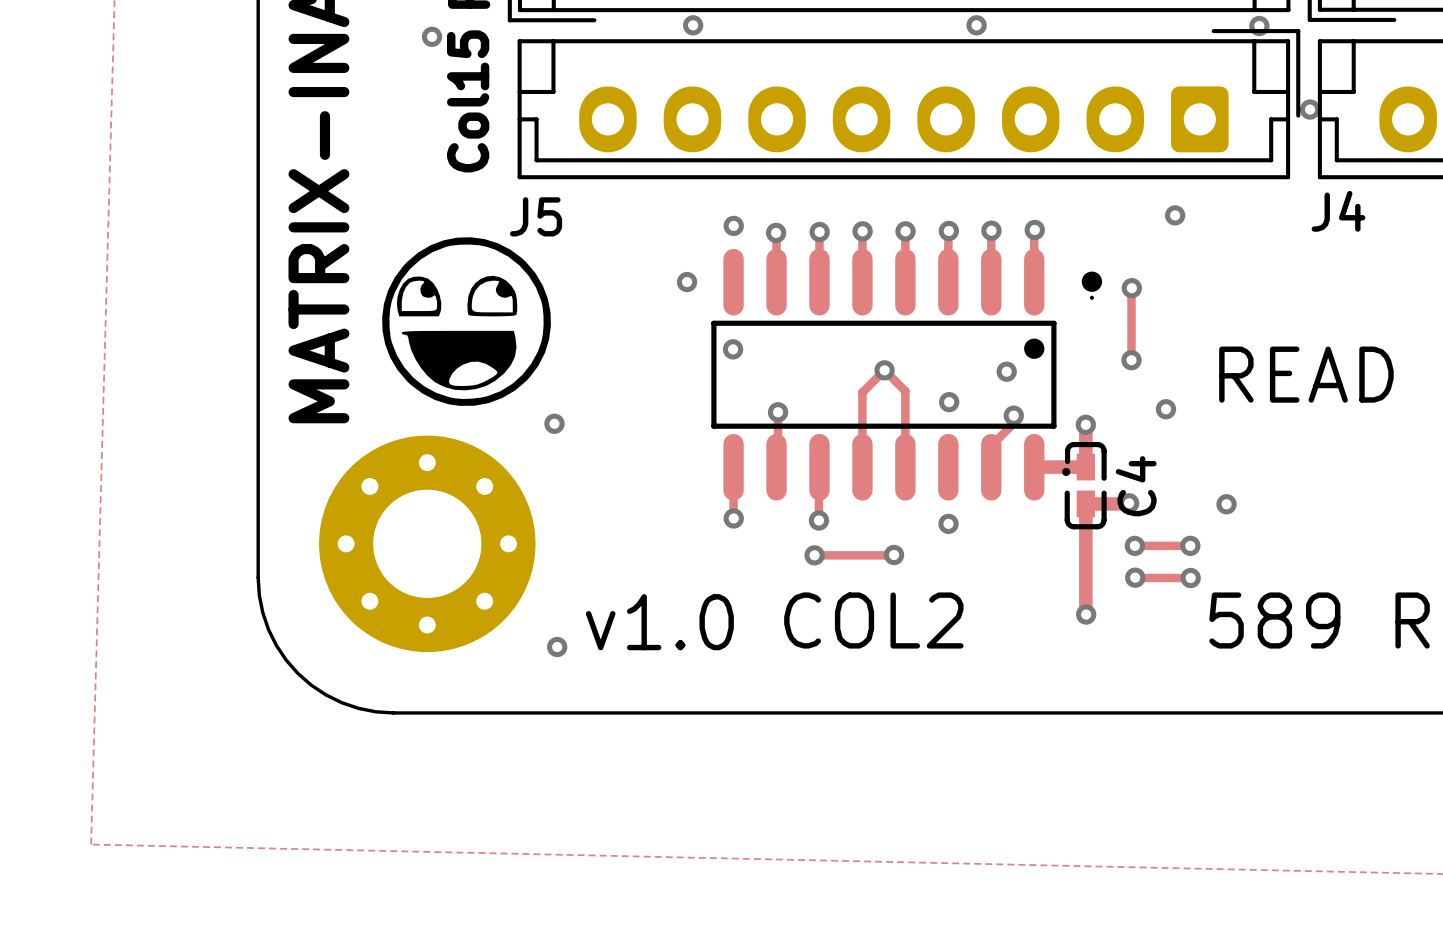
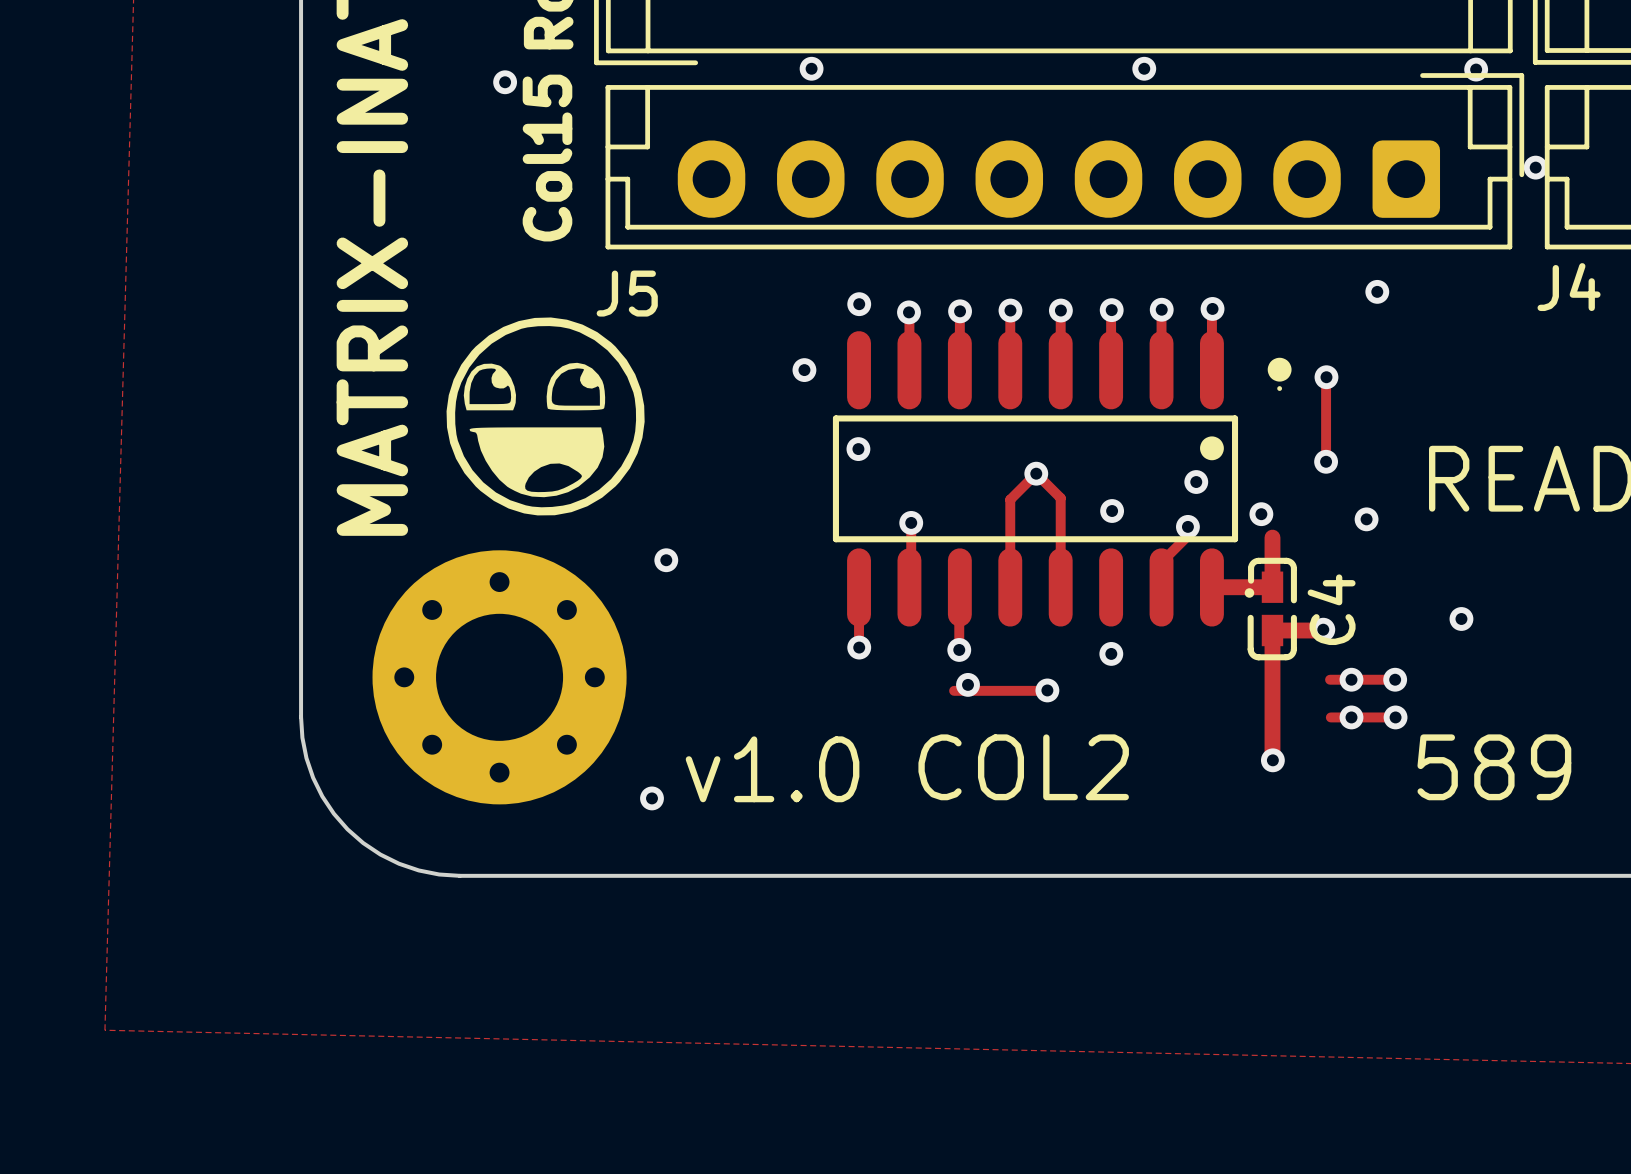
via position: (1006, 371) -> (1196, 482)
via position: (554, 423) -> (666, 560)
via position: (1085, 424) -> (1261, 514)
via position: (1226, 504) -> (1461, 618)
via position: (1134, 545) -> (1351, 679)
via position: (814, 555) -> (968, 684)
via position: (1135, 577) -> (1351, 717)

